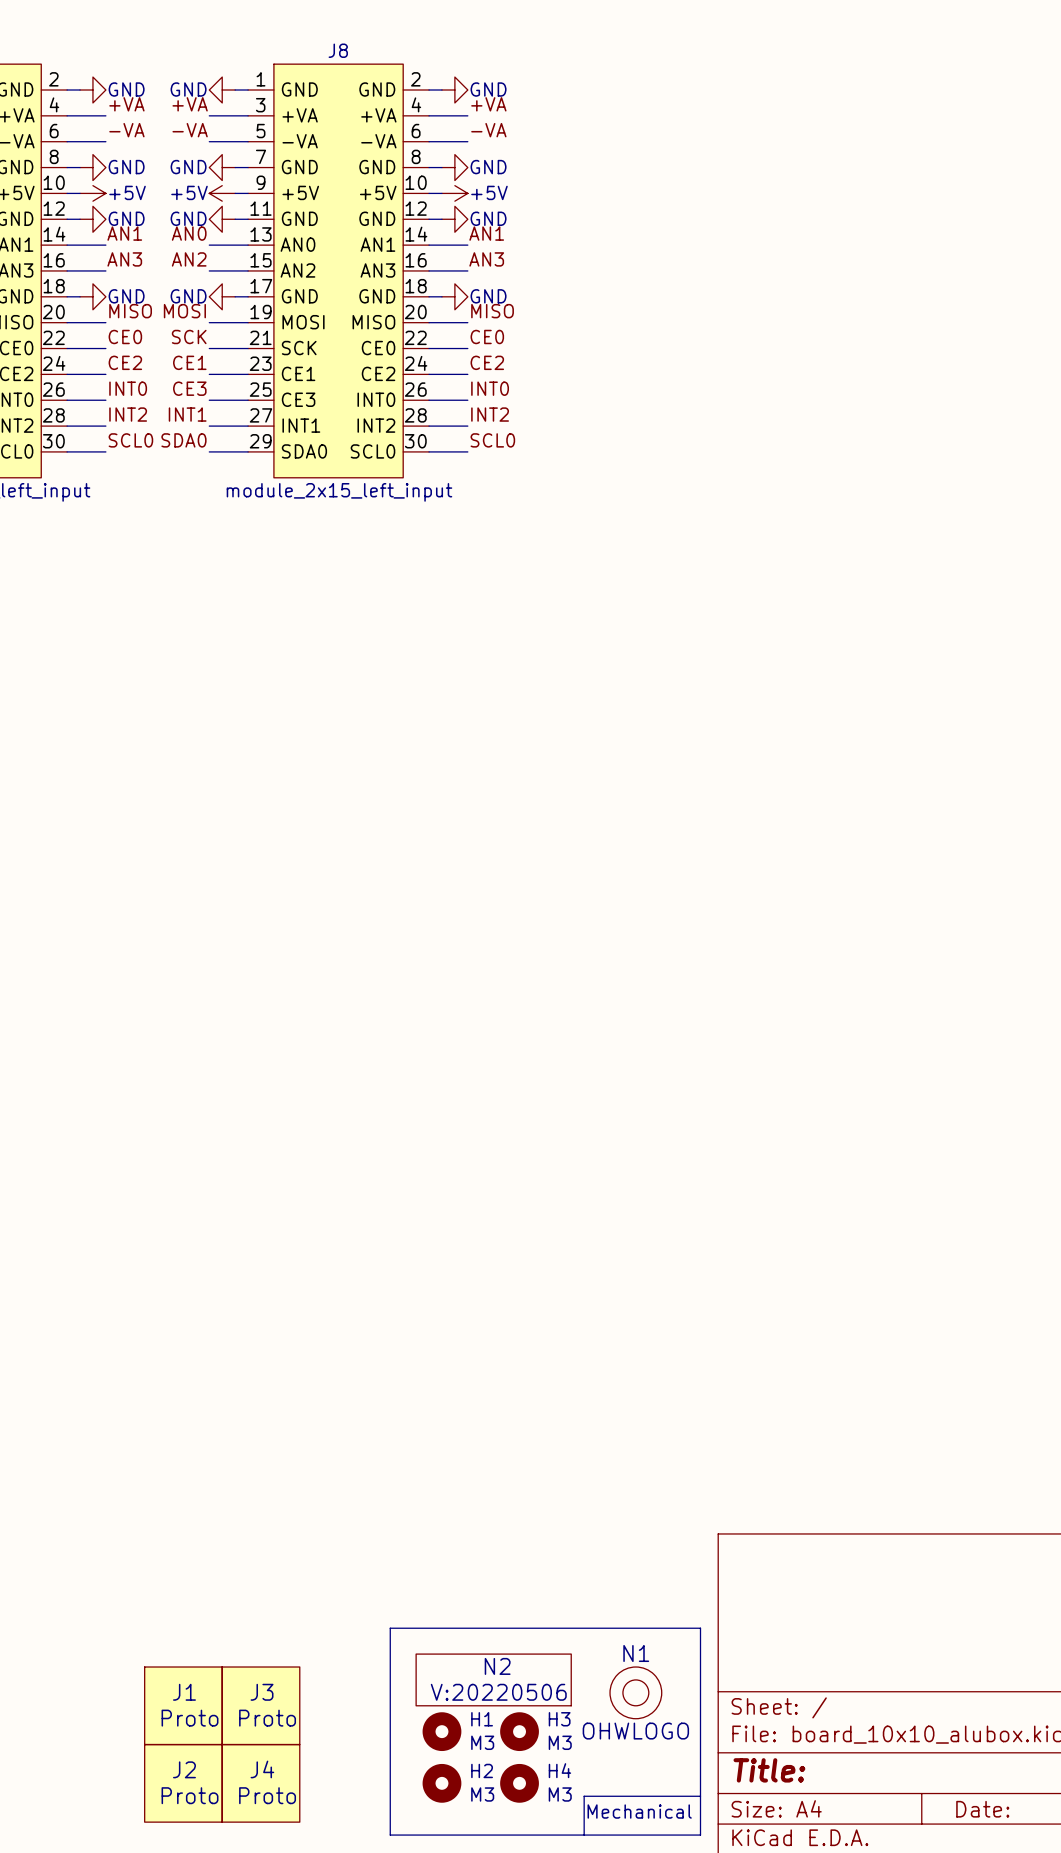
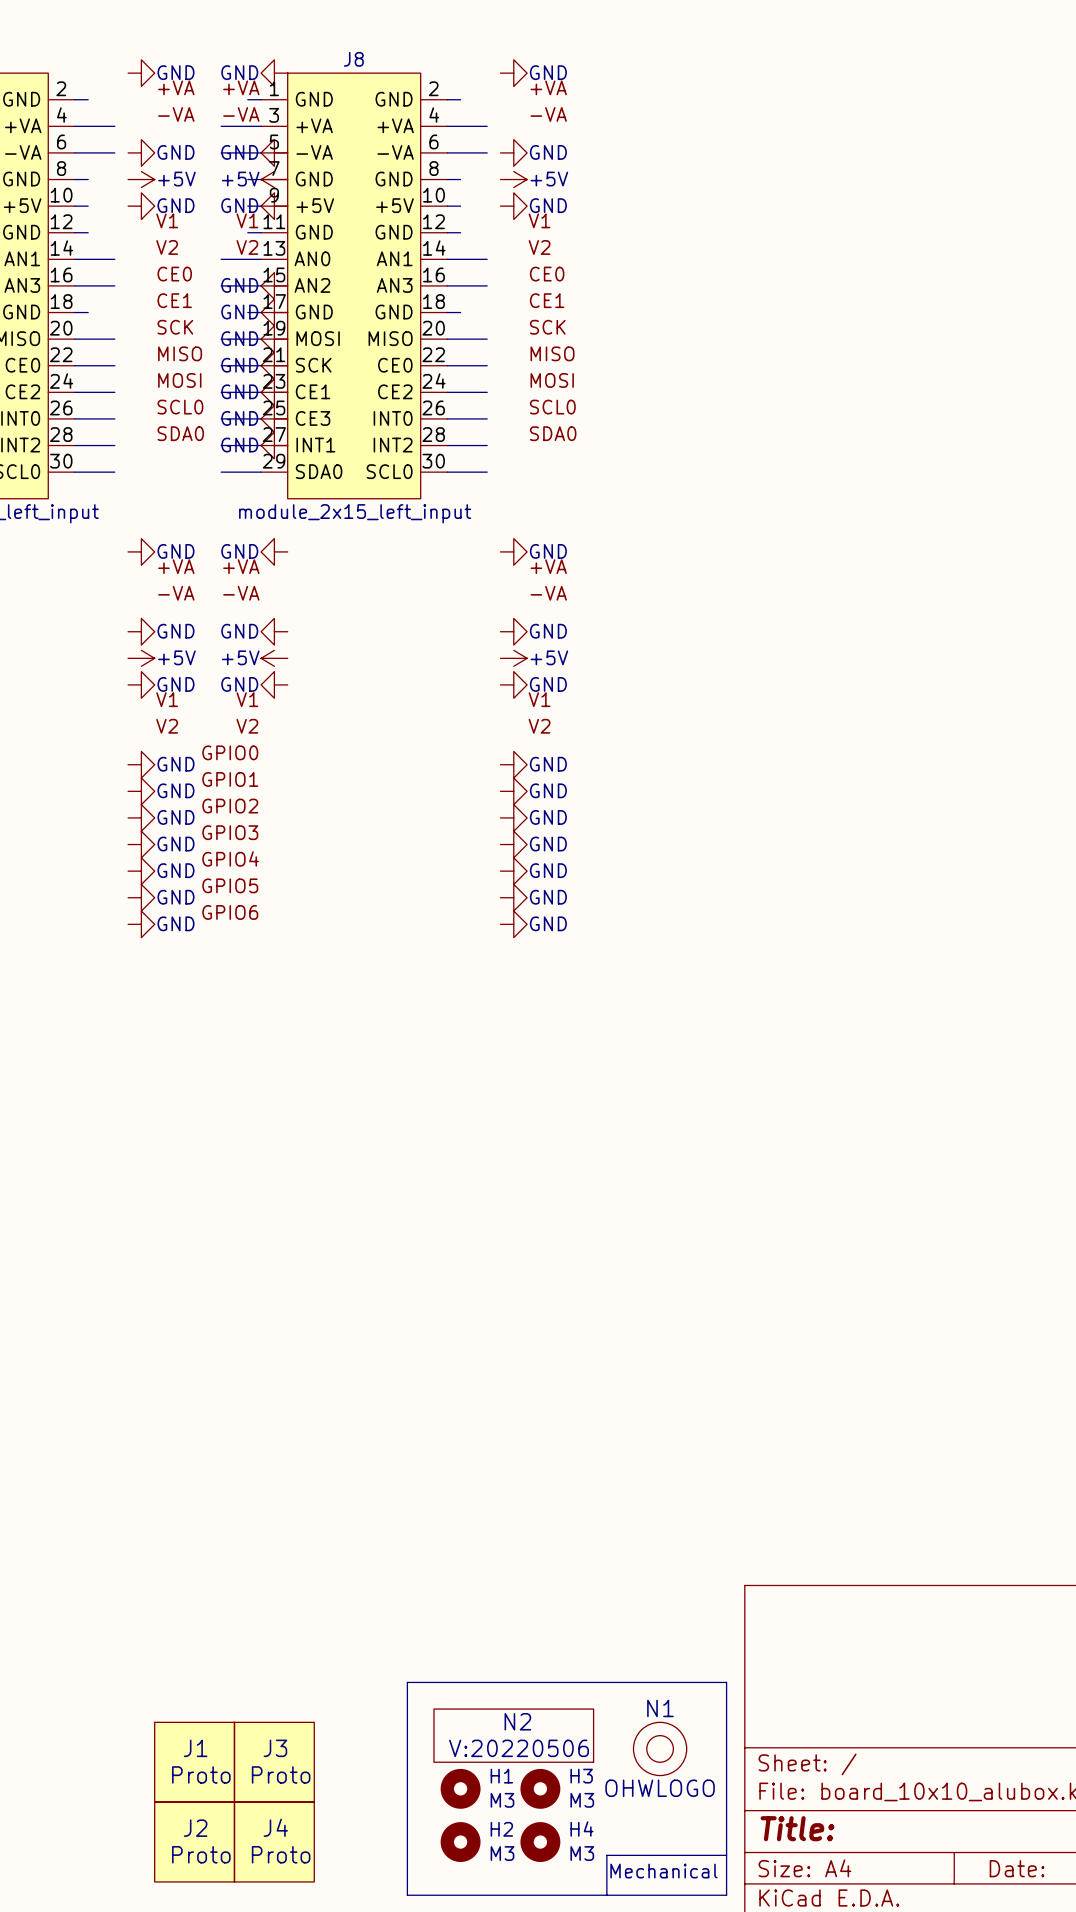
power symbol: none -> GND (141, 73)
power symbol: none -> GND (274, 73)
power symbol: none -> GND (513, 73)
label: none -> +VA (176, 87)
label: none -> +VA (241, 87)
power symbol: GND (92, 90) -> none
power symbol: GND (222, 90) -> none
power symbol: GND (454, 90) -> none
label: +VA (126, 104) -> none
label: none -> -VA (176, 114)
label: +VA (190, 104) -> none
label: none -> -VA (241, 114)
label position: +VA (488, 104) -> +VA (548, 87)
label: -VA (126, 130) -> none
label: -VA (190, 130) -> none
label position: -VA (488, 130) -> -VA (548, 114)
power symbol: none -> GND (141, 152)
power symbol: none -> GND (274, 152)
power symbol: none -> GND (513, 152)
power symbol: GND (92, 167) -> none
power symbol: GND (222, 167) -> none
power symbol: GND (454, 167) -> none
power symbol position: +5V (92, 193) -> +5V (141, 179)
power symbol: none -> GND (141, 206)
power symbol position: +5V (222, 193) -> +5V (274, 179)
power symbol: none -> GND (274, 206)
power symbol position: +5V (454, 193) -> +5V (513, 179)
power symbol: none -> GND (513, 206)
label: none -> V1 (167, 220)
label: none -> V1 (247, 220)
label: none -> V1 (539, 220)
power symbol: GND (92, 219) -> none
power symbol: GND (222, 219) -> none
power symbol: GND (454, 219) -> none
label: AN1 (124, 233) -> none
label: none -> V2 (167, 247)
label: AN0 (189, 233) -> none
label: none -> V2 (247, 247)
label: AN1 (486, 233) -> none
label: none -> V2 (539, 247)
label: AN3 (124, 259) -> none
label: AN2 (189, 259) -> none
label: AN3 (486, 259) -> none
power symbol: none -> GND (274, 285)
label: none -> CE1 (547, 300)
power symbol: GND (92, 296) -> none
power symbol: GND (222, 296) -> none
power symbol: none -> GND (274, 312)
power symbol: GND (454, 296) -> none
label position: MISO (130, 311) -> MISO (180, 353)
label position: MOSI (184, 311) -> MOSI (179, 380)
label position: MISO (492, 311) -> MISO (552, 353)
label: none -> SCK (547, 327)
power symbol: none -> GND (274, 339)
label position: CE0 (125, 336) -> CE0 (174, 274)
label position: SCK (189, 336) -> SCK (175, 327)
label position: CE0 (487, 336) -> CE0 (547, 274)
power symbol: none -> GND (274, 365)
label: CE2 (125, 362) -> none
label position: CE1 (189, 362) -> CE1 (174, 300)
label: CE2 (487, 362) -> none
label: none -> MOSI (552, 380)
power symbol: none -> GND (274, 392)
label: INT0 (128, 388) -> none
label: CE3 (189, 388) -> none
label: INT0 (490, 388) -> none
power symbol: none -> GND (274, 418)
label: INT2 (128, 414) -> none
label: INT1 (187, 414) -> none
label: INT2 (490, 414) -> none
label: none -> SDA0 (553, 433)
power symbol: none -> GND (274, 445)
label position: SCL0 (130, 440) -> SCL0 (180, 407)
label position: SDA0 (183, 440) -> SDA0 (180, 433)
label position: SCL0 (492, 440) -> SCL0 (552, 407)
power symbol: none -> GND (141, 551)
power symbol: none -> GND (274, 551)
power symbol: none -> GND (513, 551)
label: none -> +VA (176, 566)
label: none -> +VA (241, 566)
label: none -> +VA (548, 566)
label: none -> -VA (176, 593)
label: none -> -VA (241, 593)
label: none -> -VA (548, 593)
power symbol: none -> GND (141, 631)
power symbol: none -> GND (274, 631)
power symbol: none -> GND (513, 631)
power symbol: none -> +5V (141, 658)
power symbol: none -> +5V (274, 658)
power symbol: none -> +5V (513, 658)
power symbol: none -> GND (141, 684)
power symbol: none -> GND (274, 684)
power symbol: none -> GND (513, 684)
label: none -> V1 (167, 699)
label: none -> V1 (247, 699)
label: none -> V1 (539, 699)
label: none -> V2 (167, 726)
label: none -> V2 (247, 726)
label: none -> V2 (539, 726)
label: none -> GPIO0 (230, 752)
power symbol: none -> GND (141, 764)
power symbol: none -> GND (513, 764)
label: none -> GPIO1 (230, 779)
power symbol: none -> GND (141, 791)
power symbol: none -> GND (513, 791)
label: none -> GPIO2 (230, 806)
power symbol: none -> GND (141, 817)
power symbol: none -> GND (513, 817)
label: none -> GPIO3 (230, 832)
power symbol: none -> GND (141, 844)
power symbol: none -> GND (513, 844)
label: none -> GPIO4 (230, 858)
power symbol: none -> GND (141, 871)
power symbol: none -> GND (513, 871)
label: none -> GPIO5 (230, 885)
power symbol: none -> GND (141, 897)
power symbol: none -> GND (513, 897)
label: none -> GPIO6 (230, 912)
power symbol: none -> GND (141, 924)
power symbol: none -> GND (513, 924)

